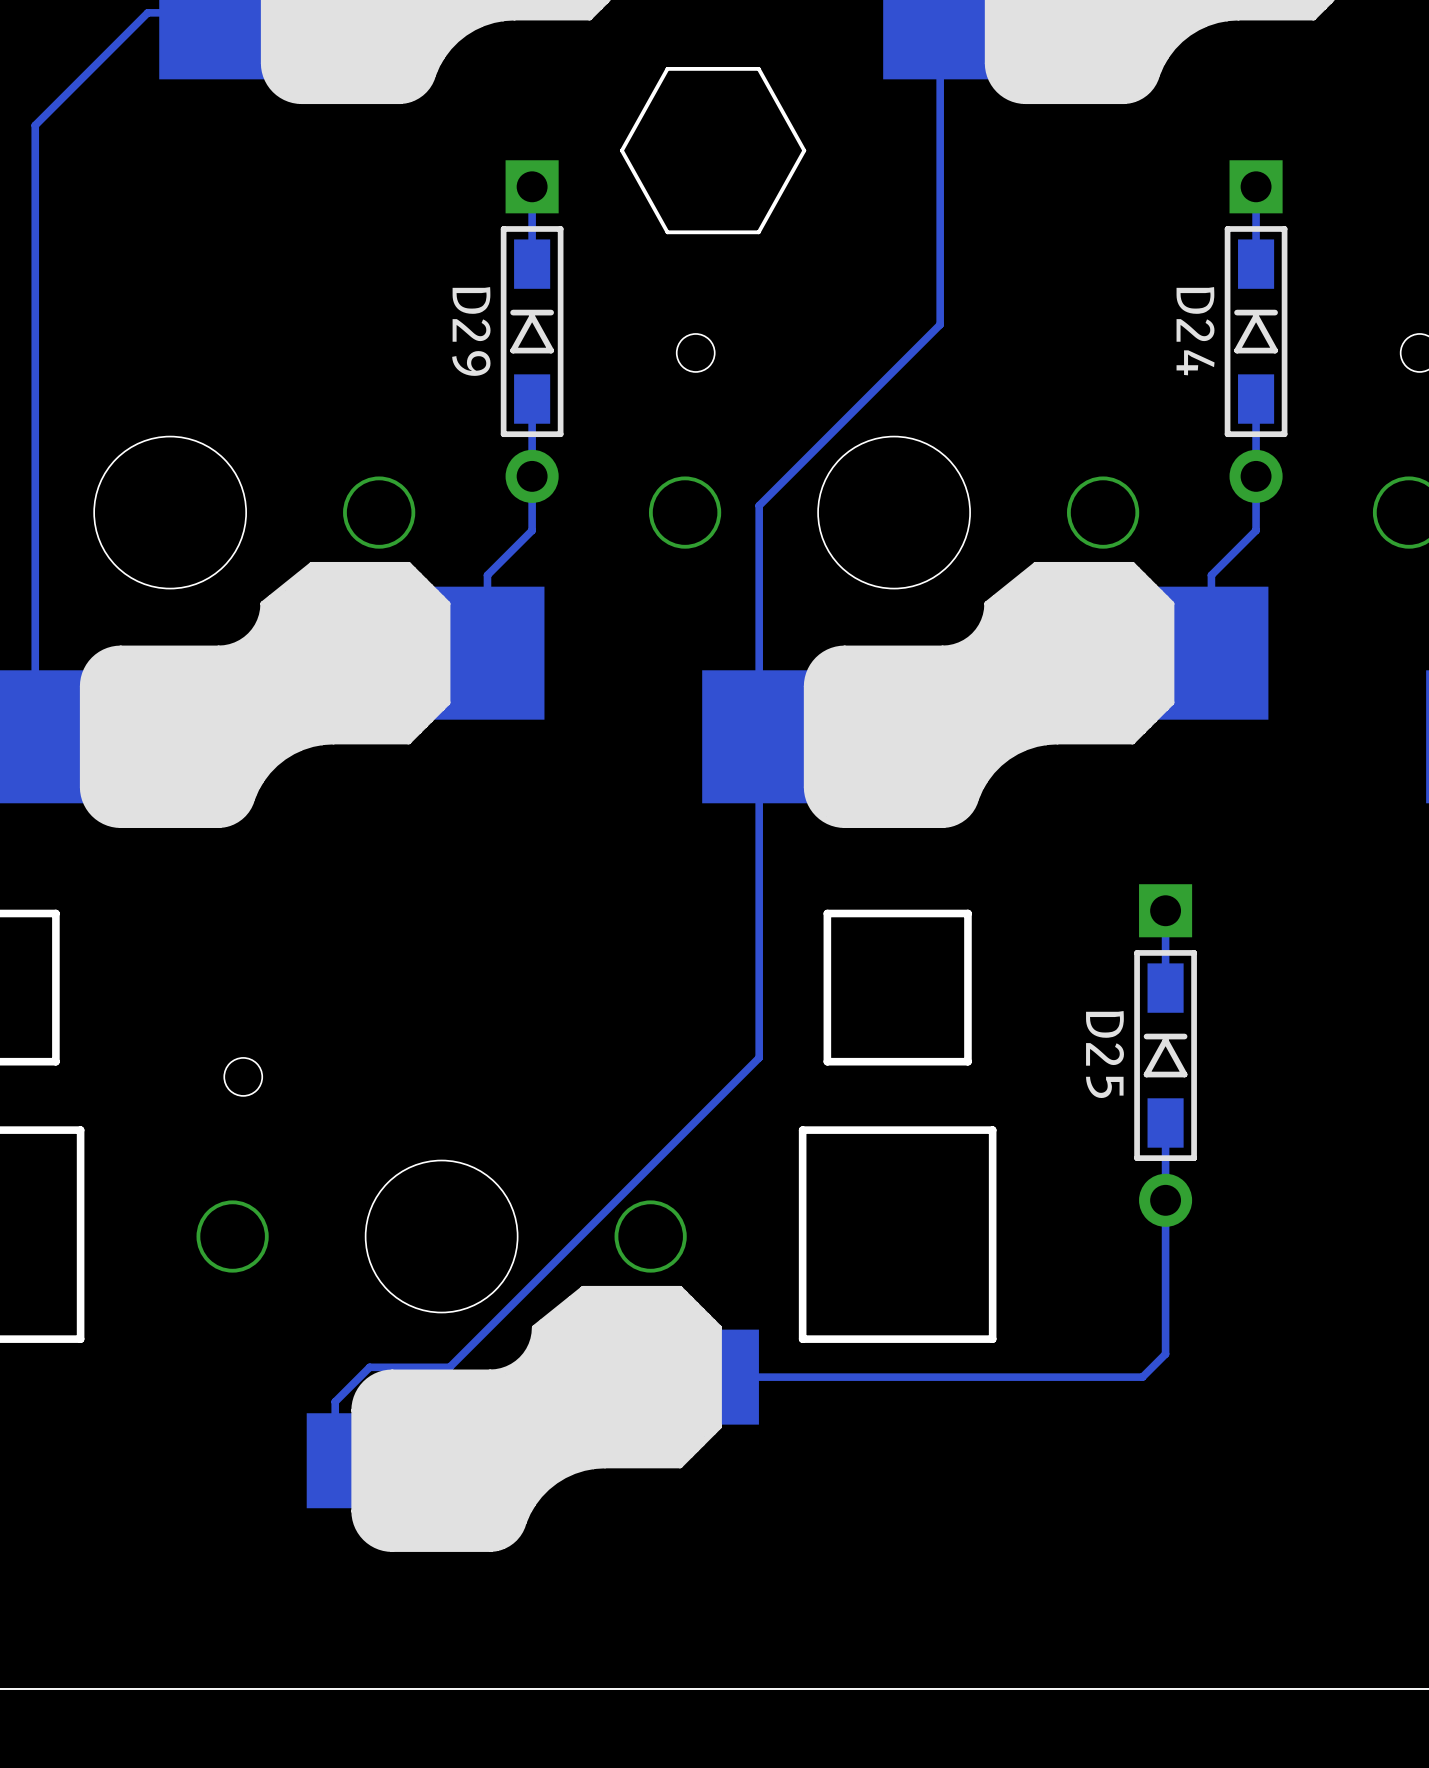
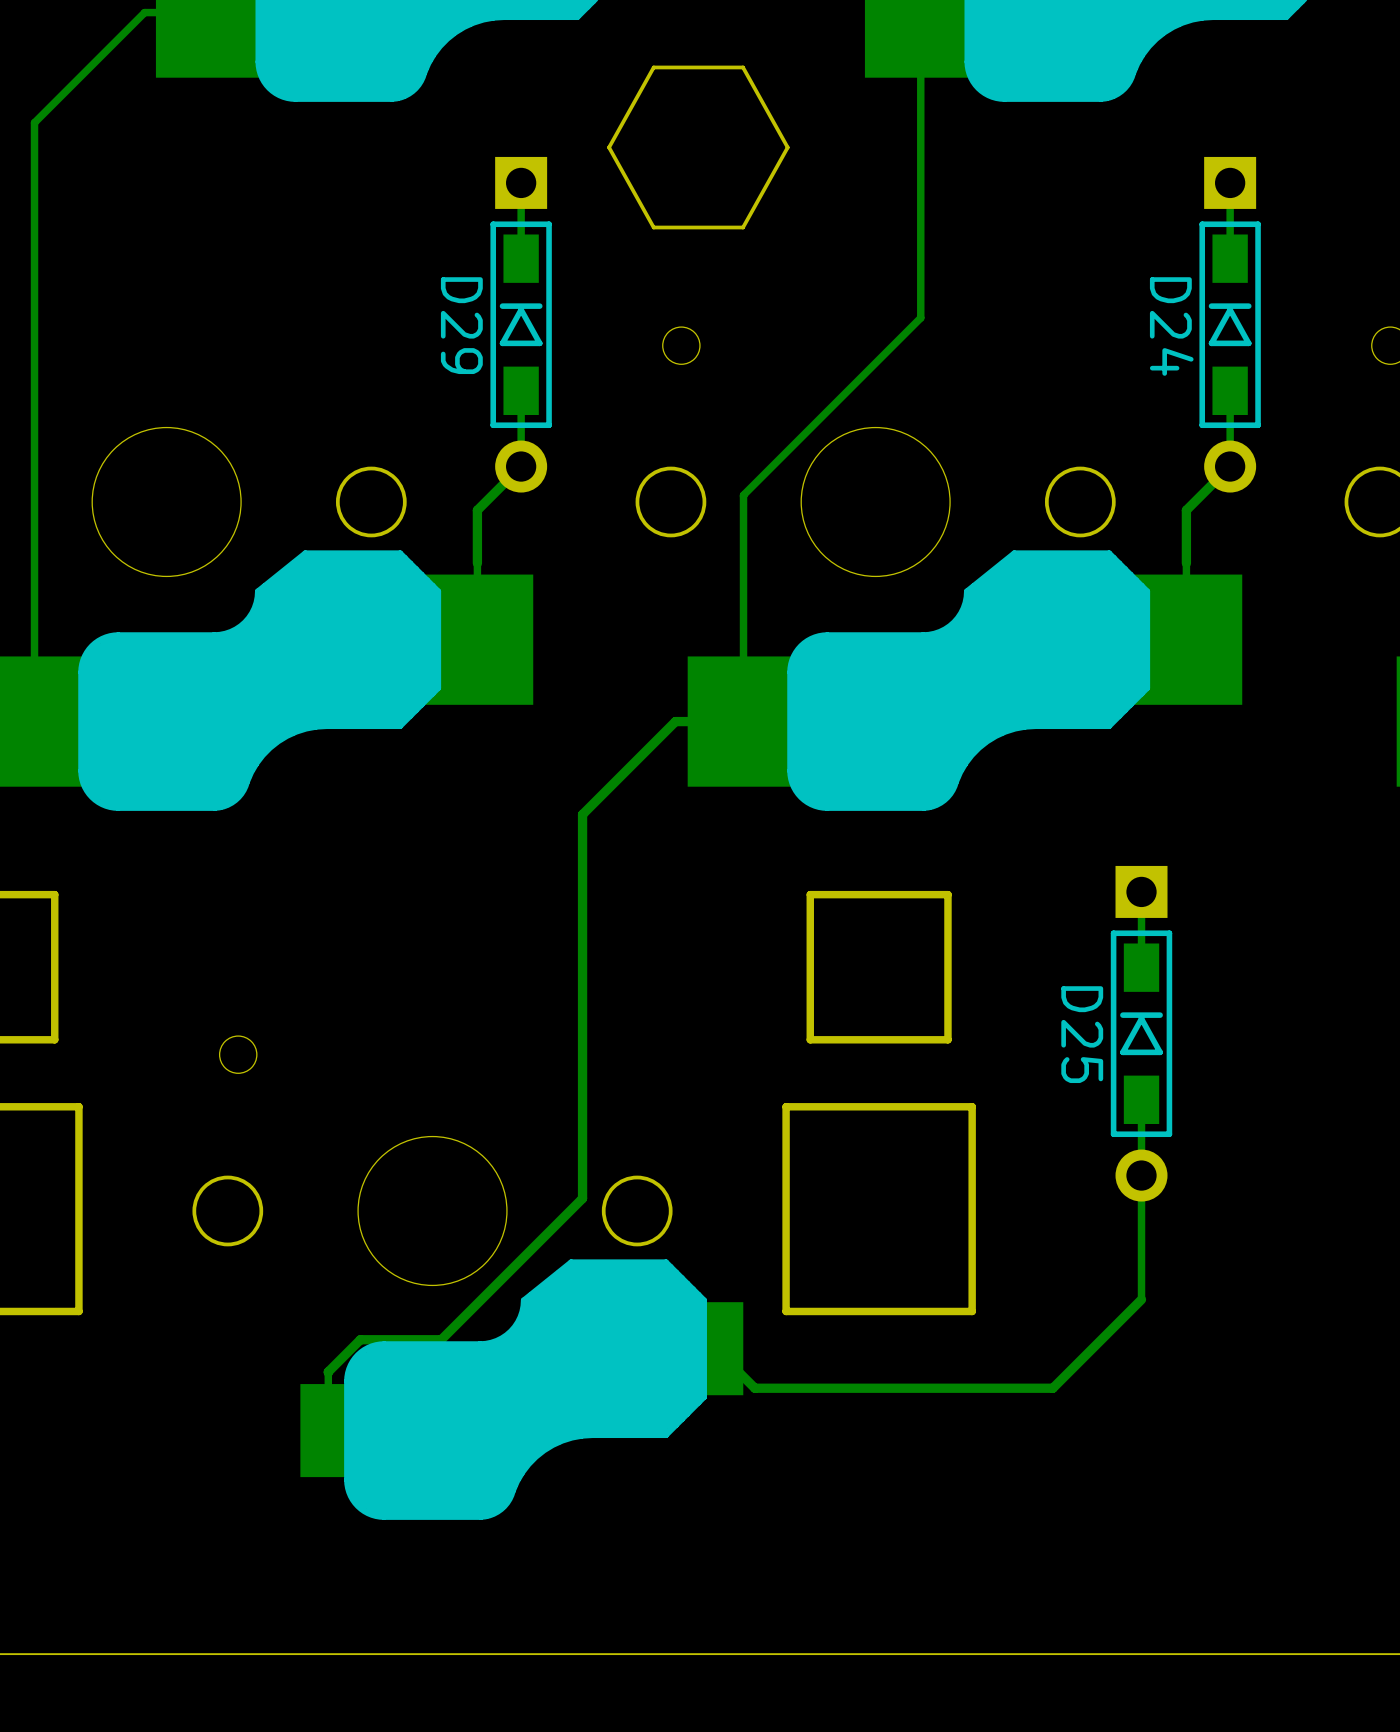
track: (532, 476) (532, 530) (487, 575) -> (521, 466) (477, 510) (477, 563)
track: (1256, 476) (1256, 530) (1211, 575) -> (1230, 466) (1186, 510) (1186, 563)
track: (759, 736) (759, 1057) (449, 1367) (369, 1367) (335, 1401) -> (743, 721) (675, 721) (582, 814) (582, 1198) (441, 1339) (360, 1339) (328, 1372)
track: (1165, 1327) (1165, 1354) (1142, 1377) (730, 1377) -> (1141, 1299) (1052, 1388) (754, 1388) (715, 1348)

